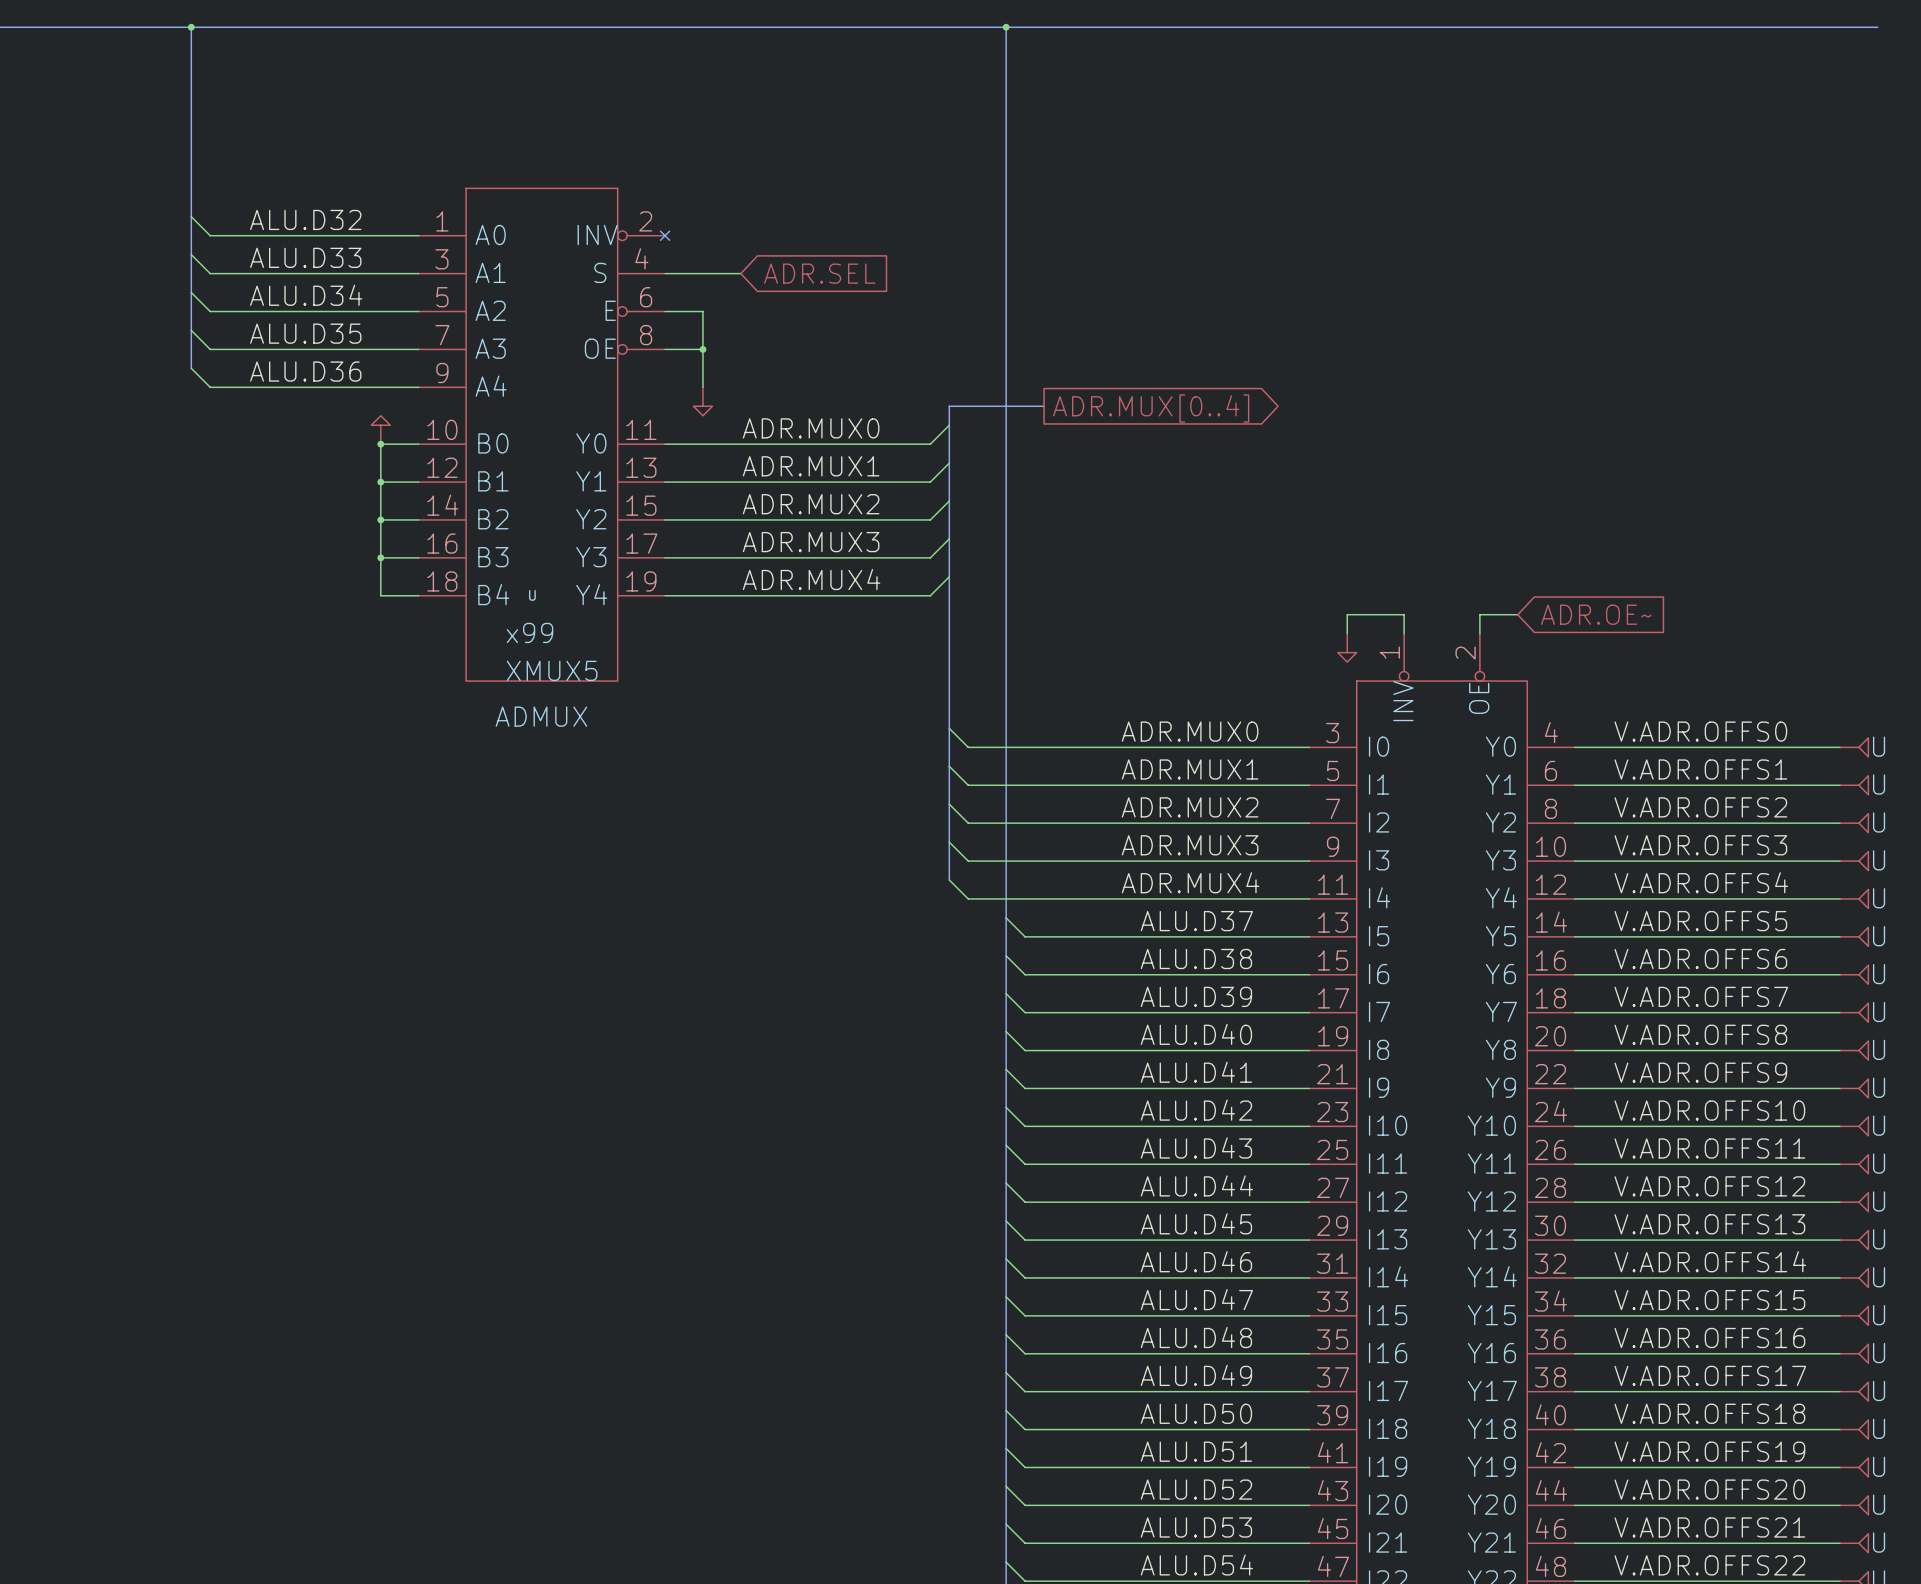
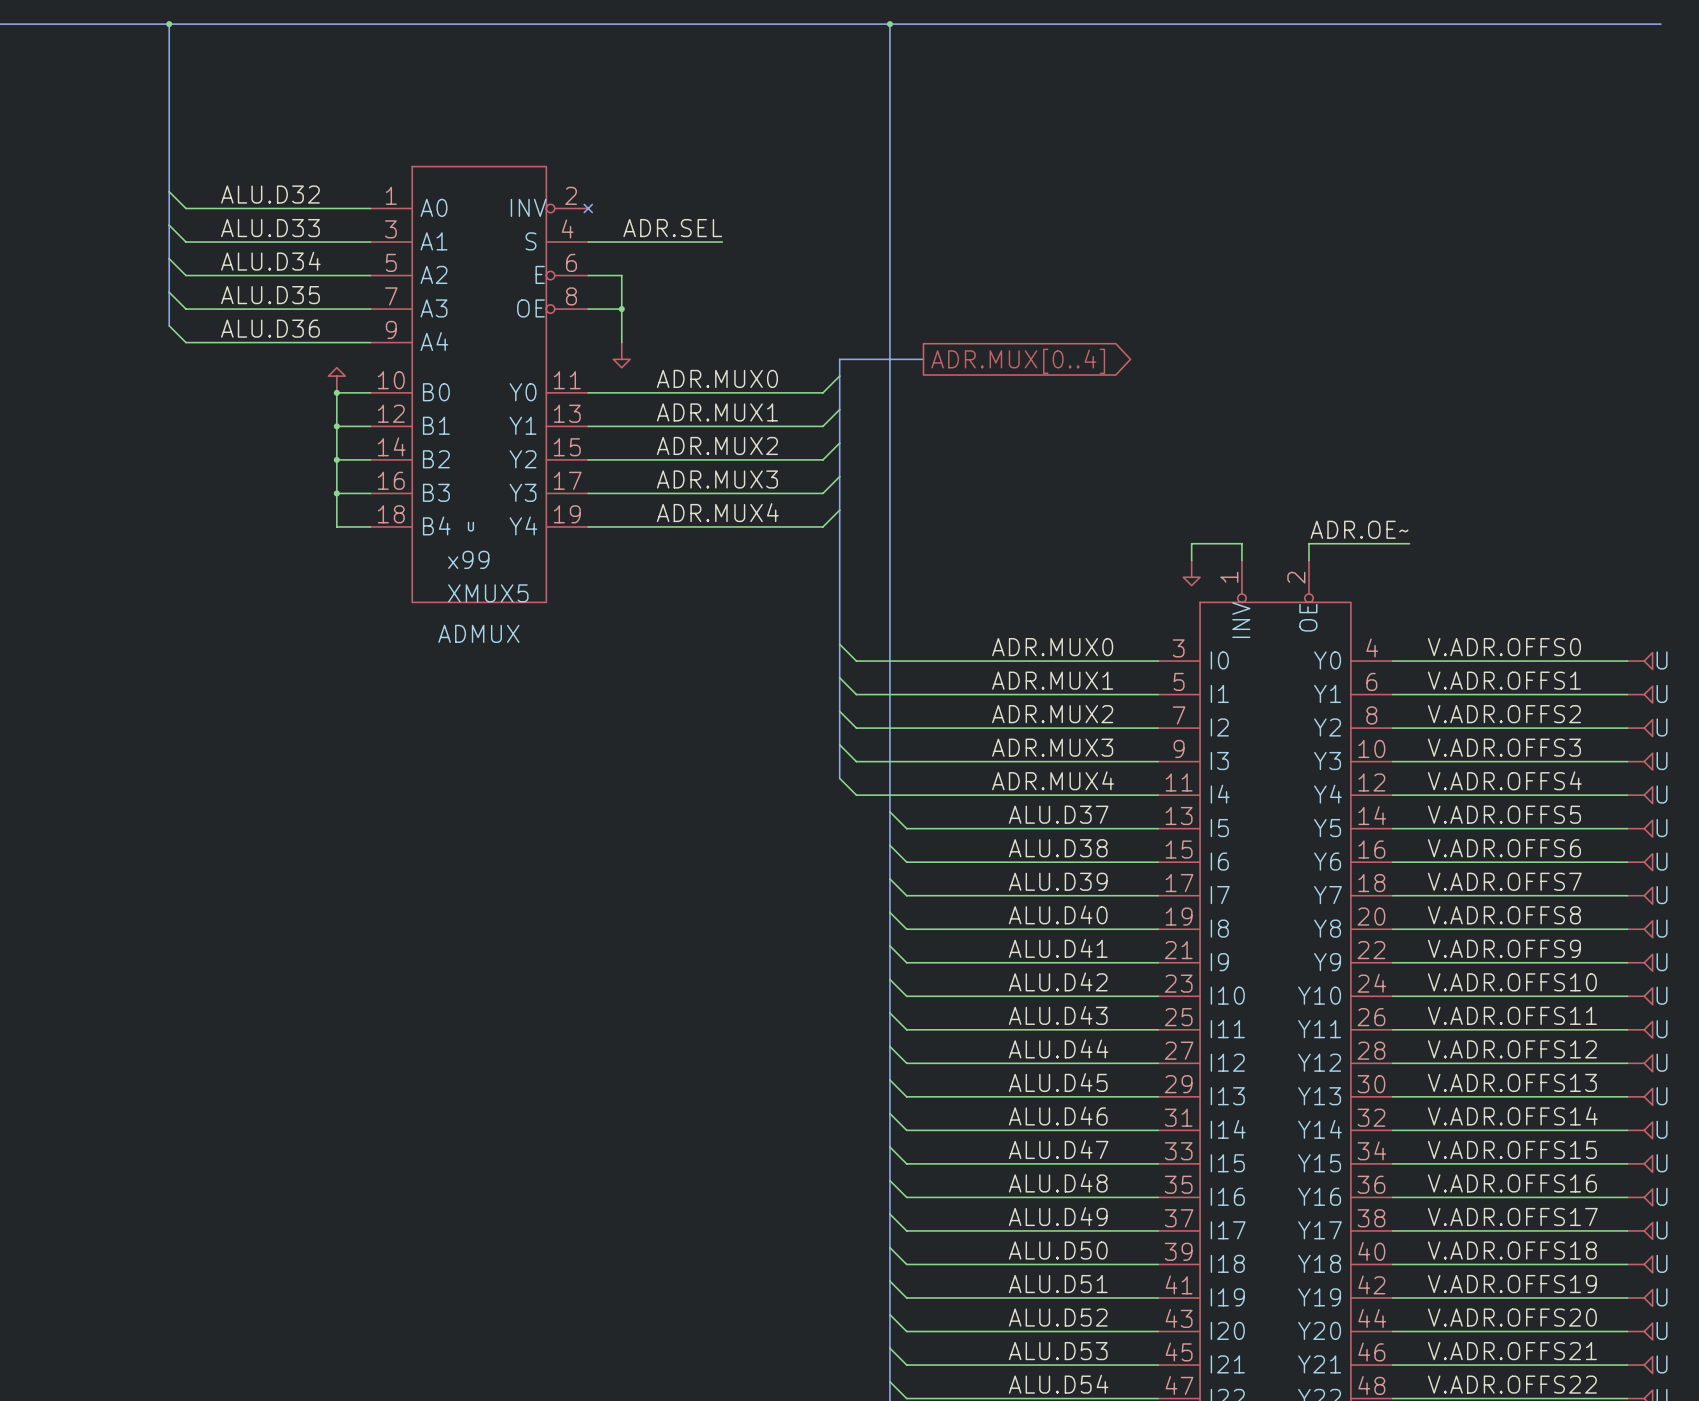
label: none -> ADR.SEL (672, 228)
wire: none -> (655, 242) (722, 242)
global label: ADR.SEL (819, 273) -> none
label: none -> ADR.OE~ (1359, 529)
wire: none -> (1342, 543) (1409, 543)
global label: ADR.OE~ (1596, 614) -> none

